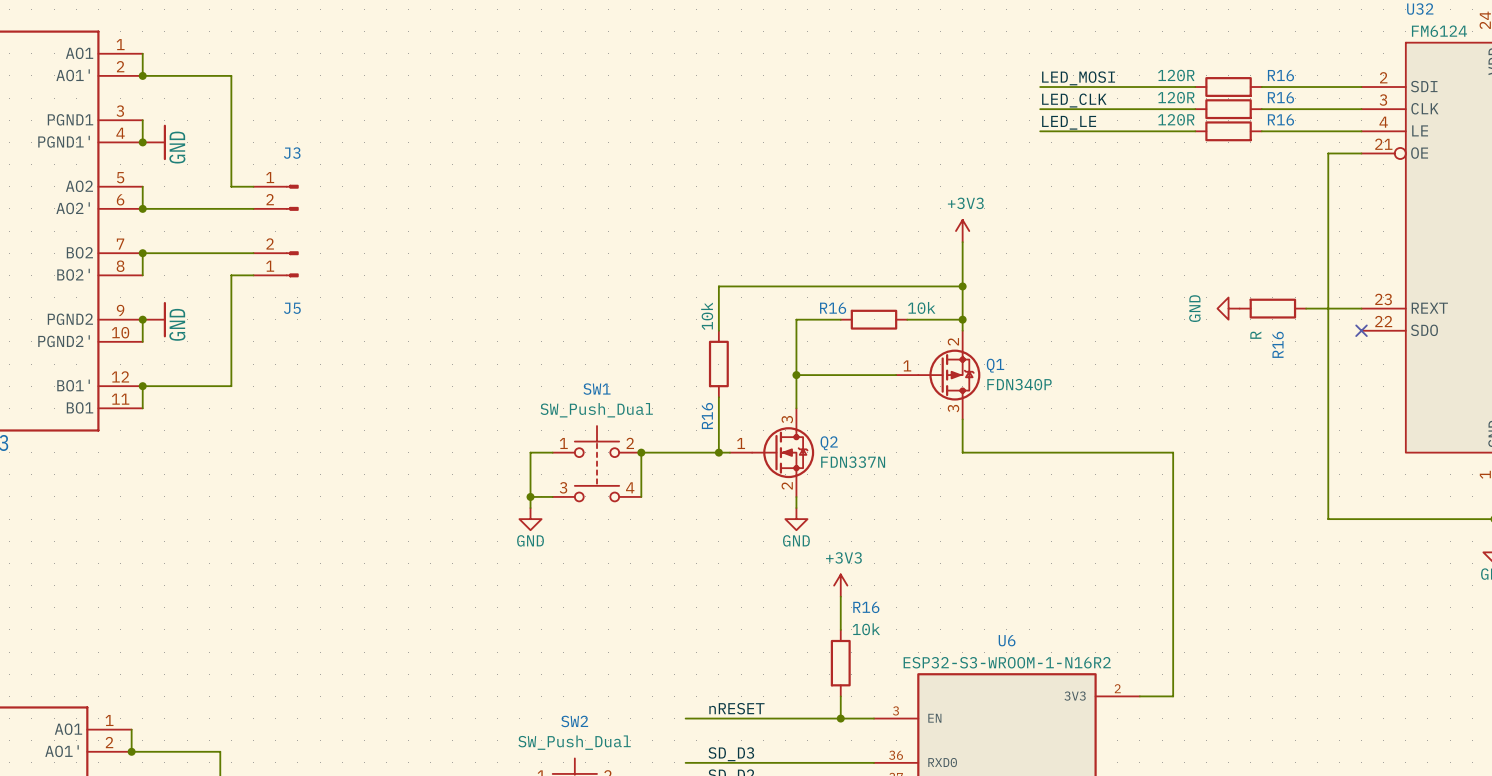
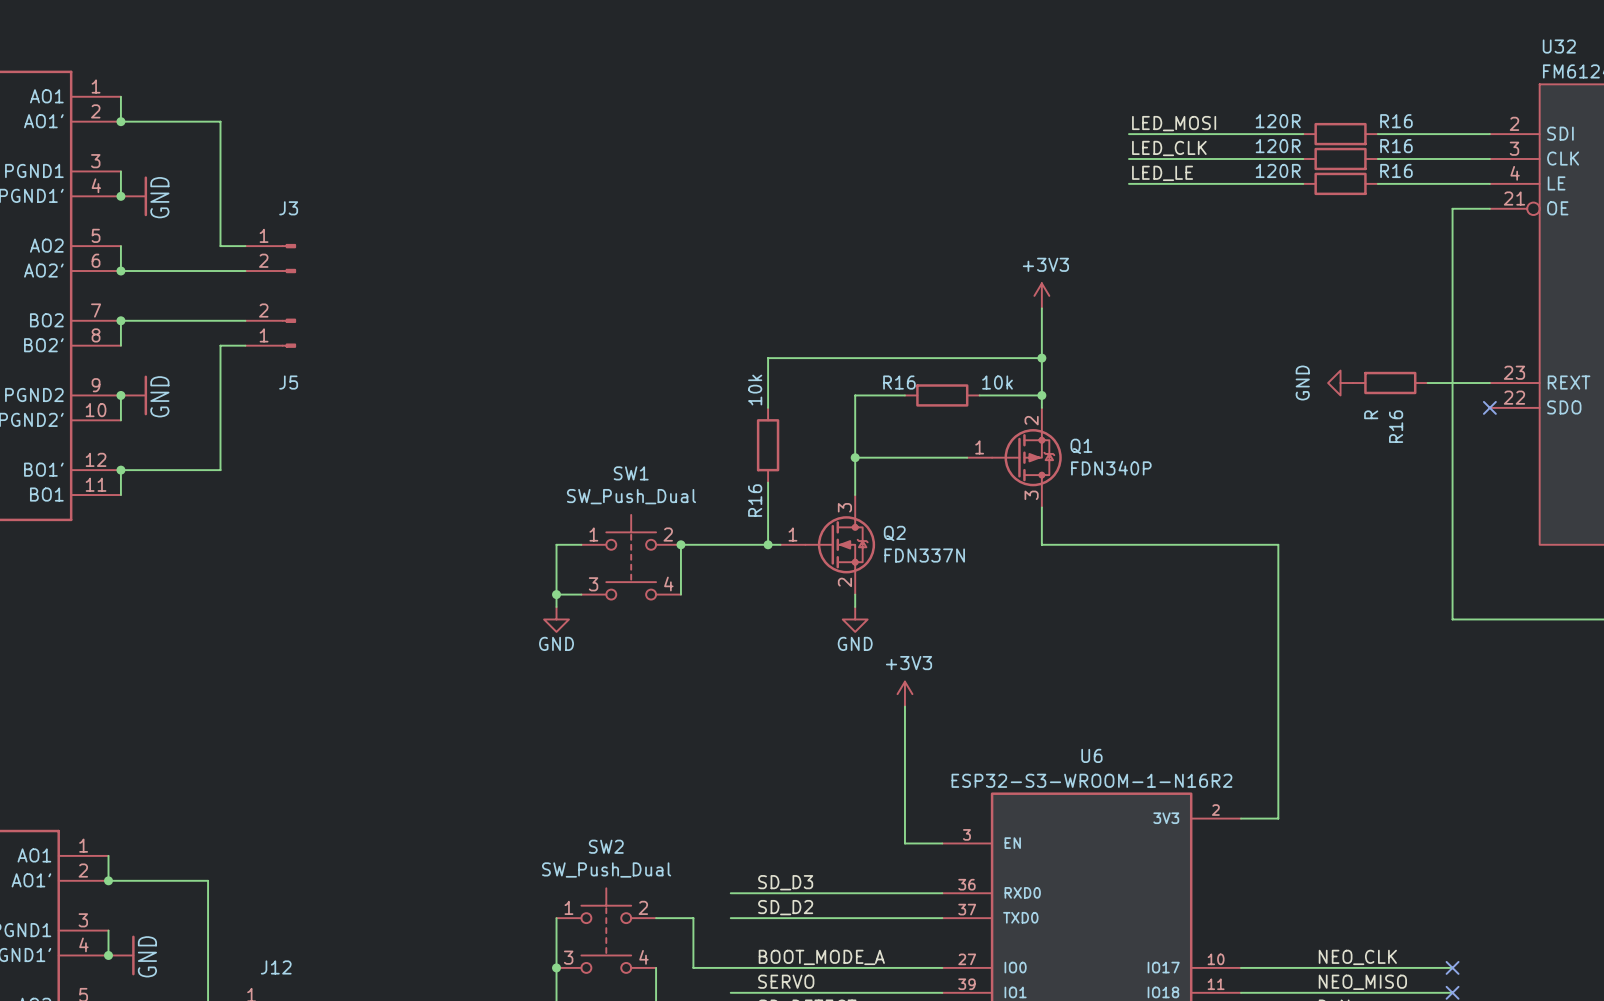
wire: none -> (904, 743) (904, 818)
R16: 10k (840, 663) -> none
label: nRESET (736, 708) -> none
wire: (685, 718) (840, 718) -> none
junction: (840, 718) -> none

